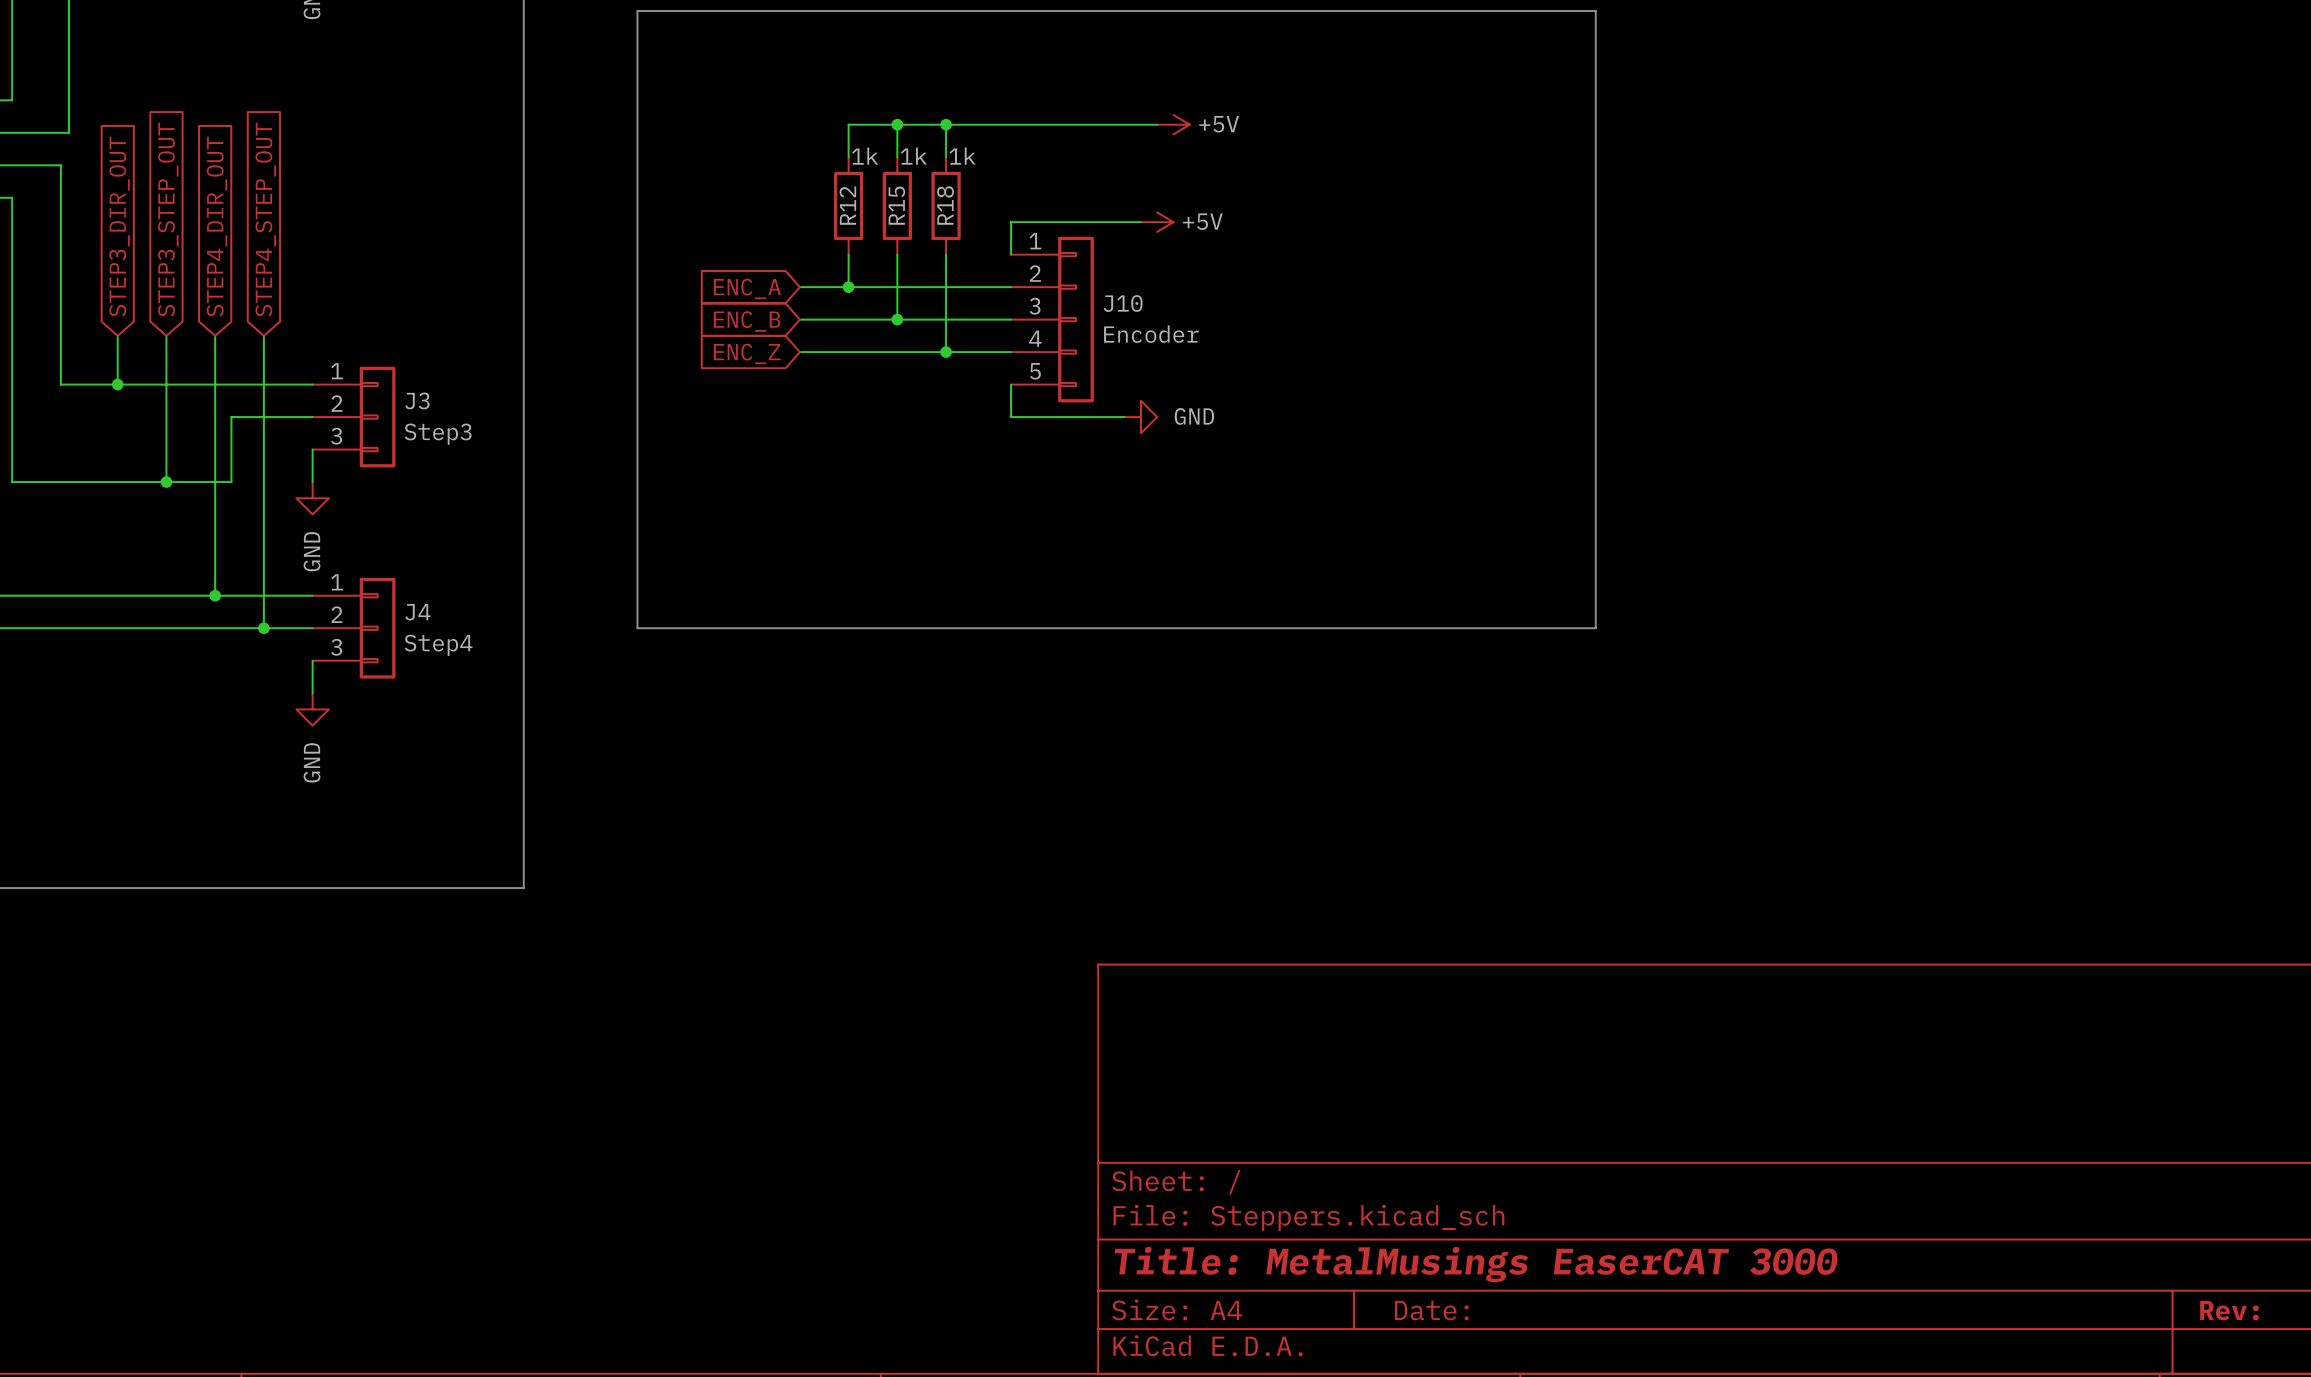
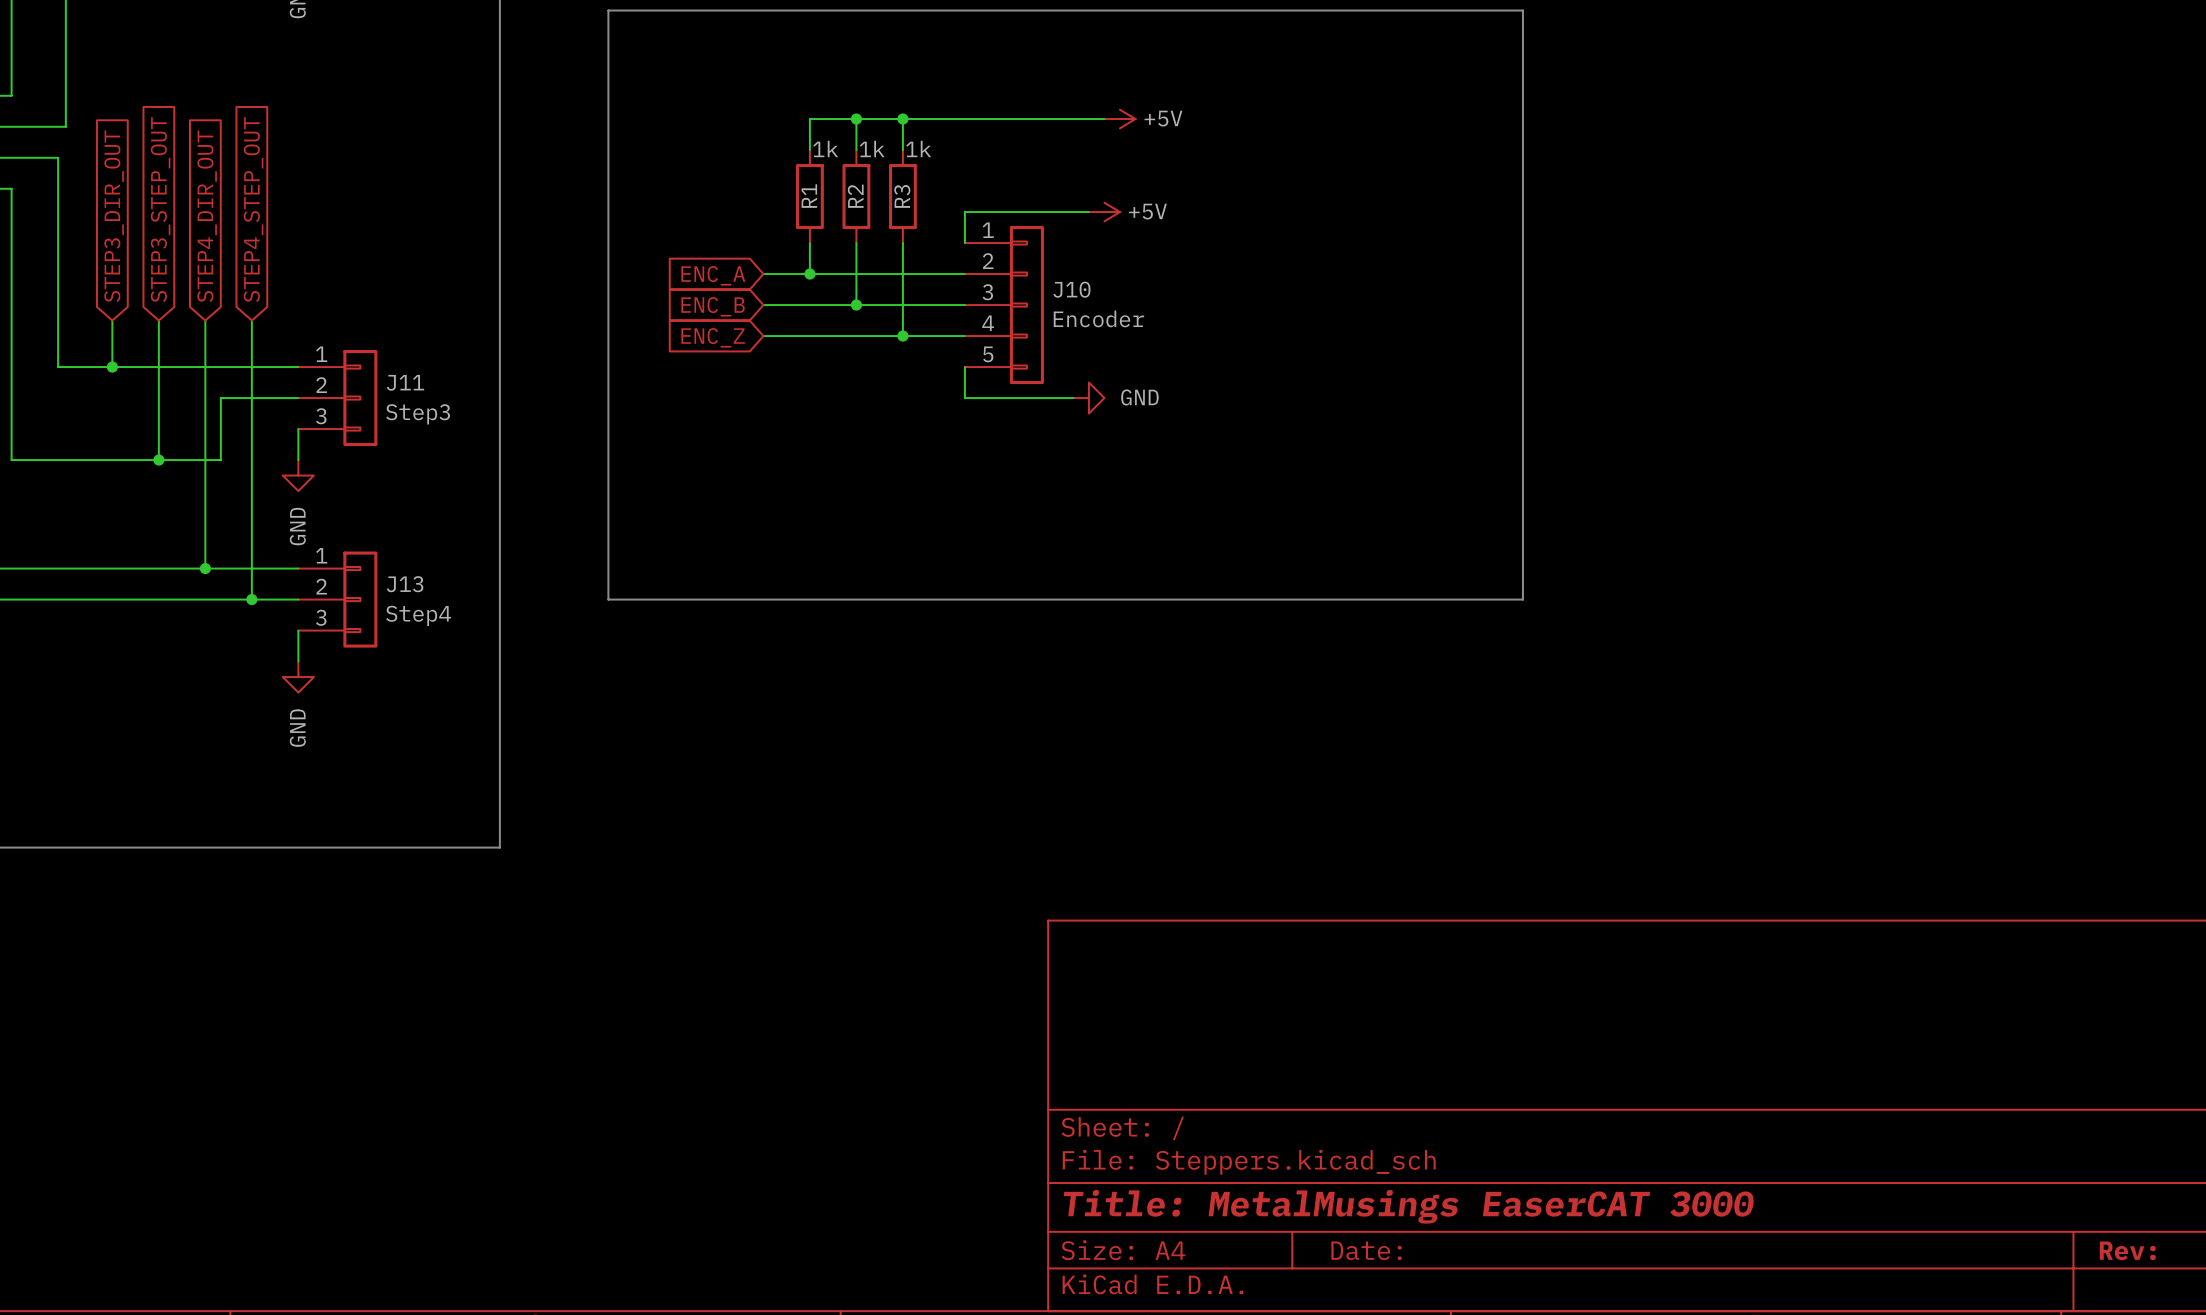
R12 name: R12 (847, 205) -> R1 (809, 196)
R15 name: R15 (896, 205) -> R2 (855, 196)
R18 name: R18 (945, 205) -> R3 (902, 196)
J3 name: J3 (417, 400) -> J11 (405, 382)
J4 name: J4 (417, 612) -> J13 (405, 584)

